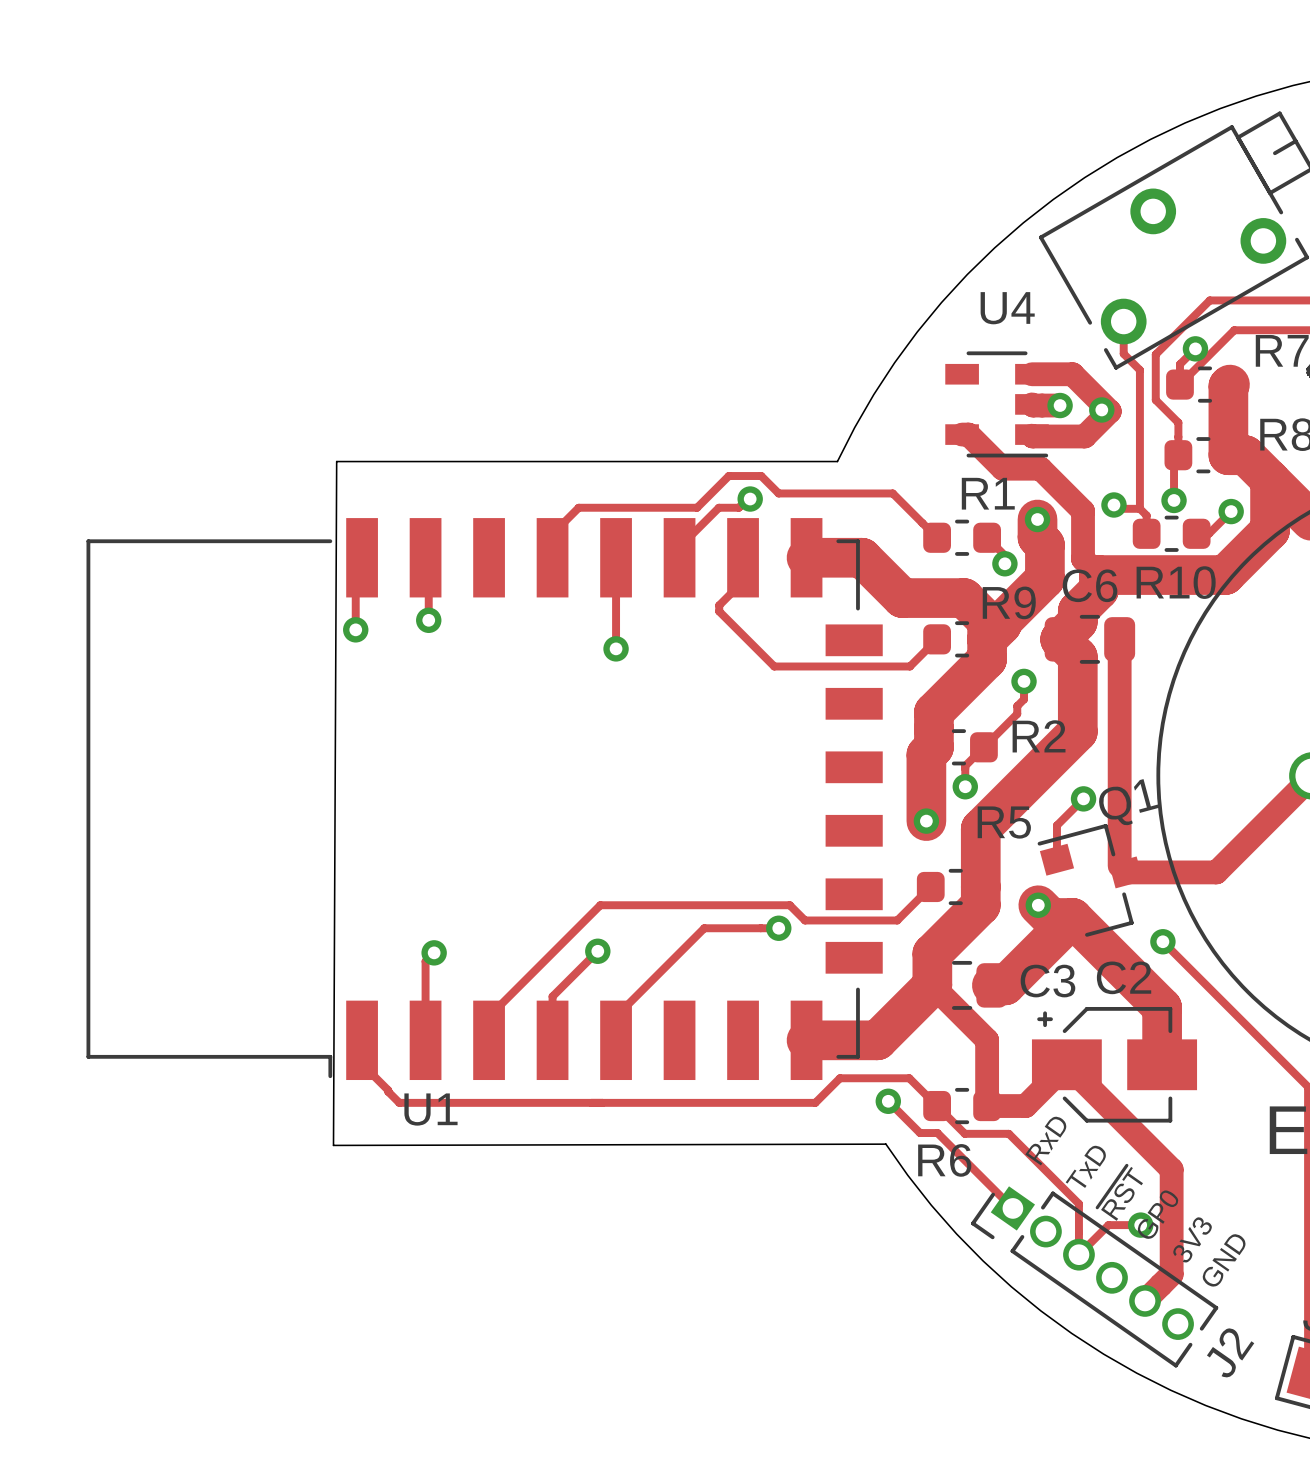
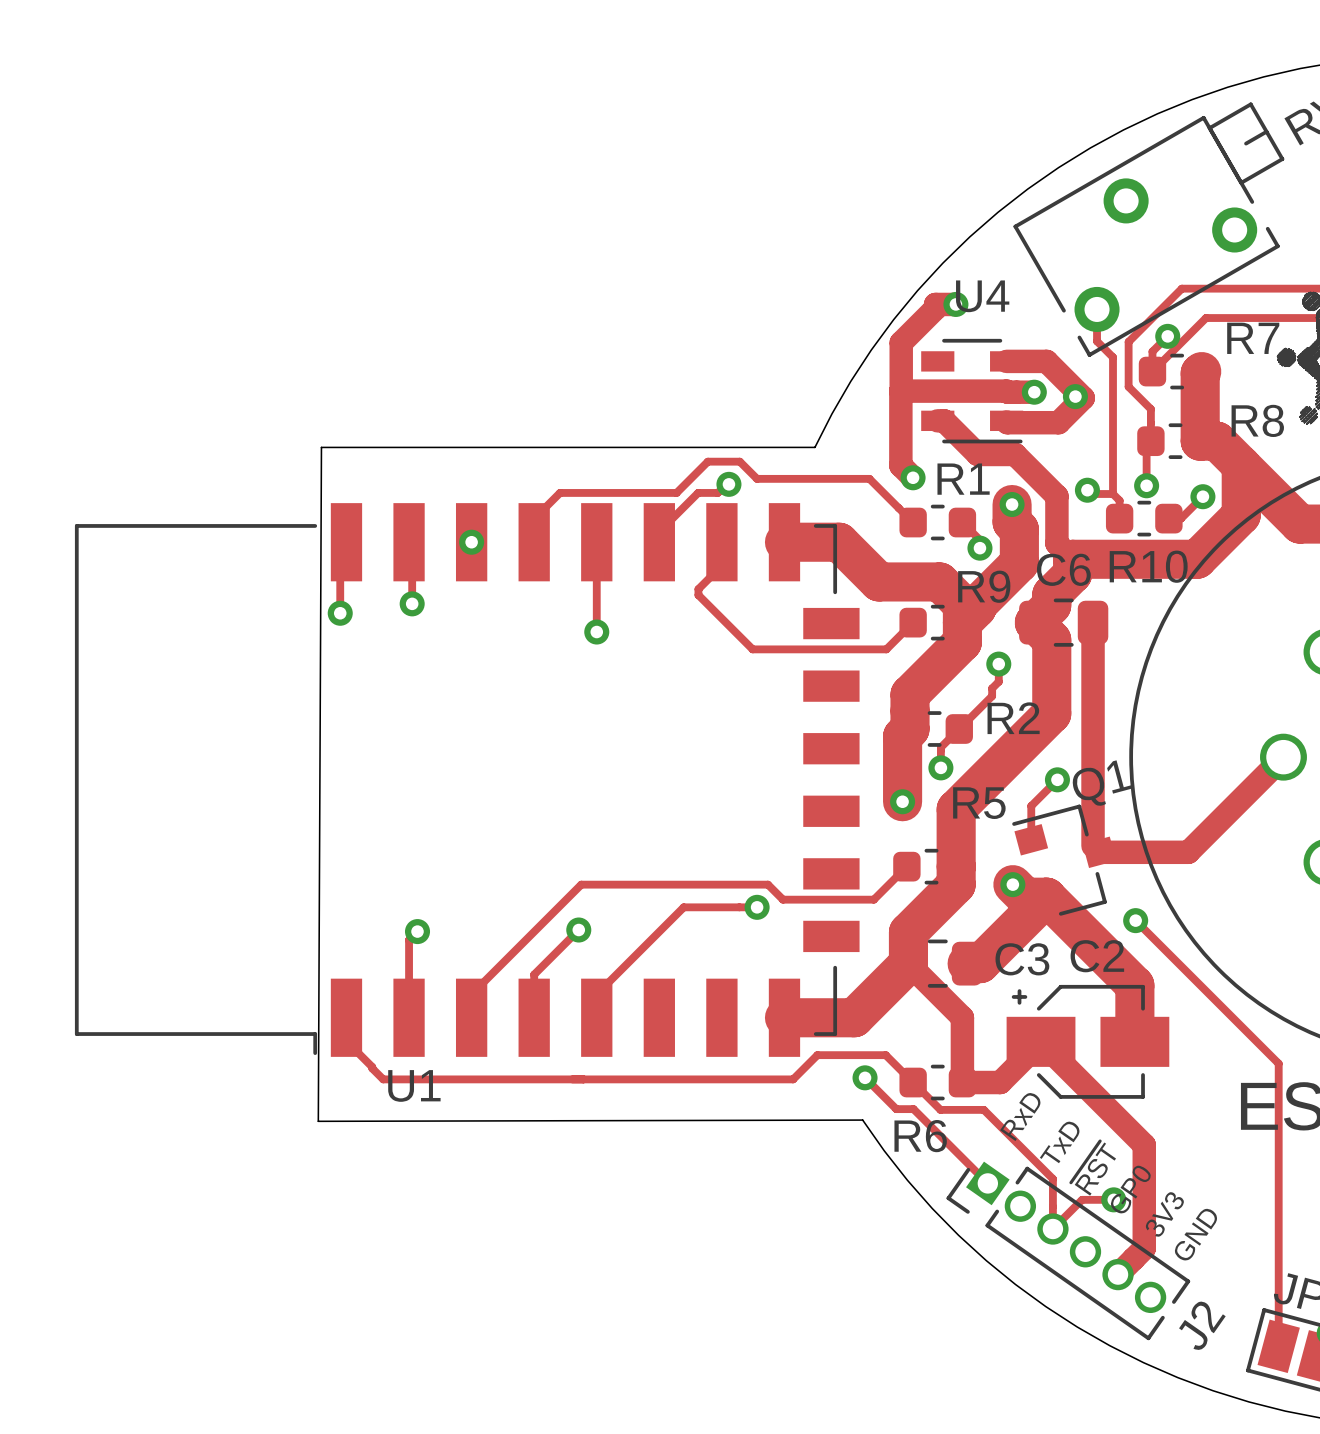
track: none -> (955, 304) (935, 304) (935, 308) (901, 342) (901, 390)
via: none -> (955, 304)
track: none -> (1006, 391) (900, 391) (900, 465) (913, 477)
via: none -> (913, 477)
via: none -> (471, 542)

